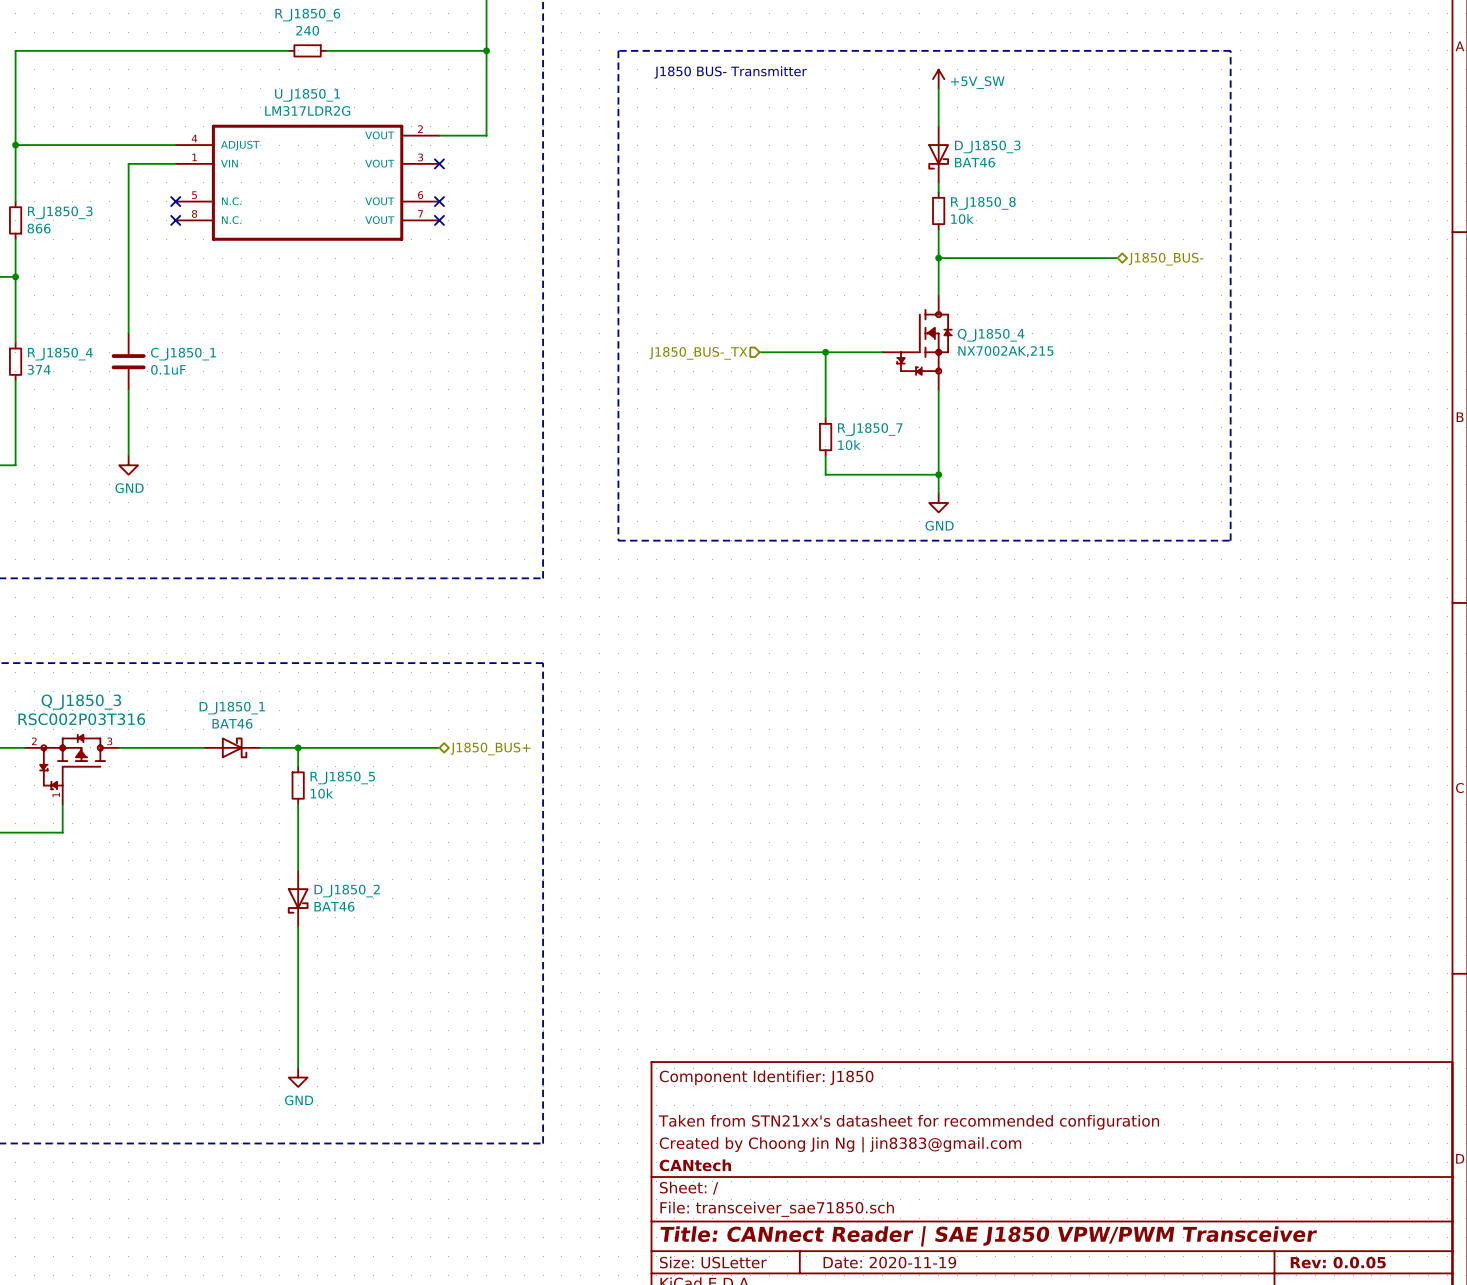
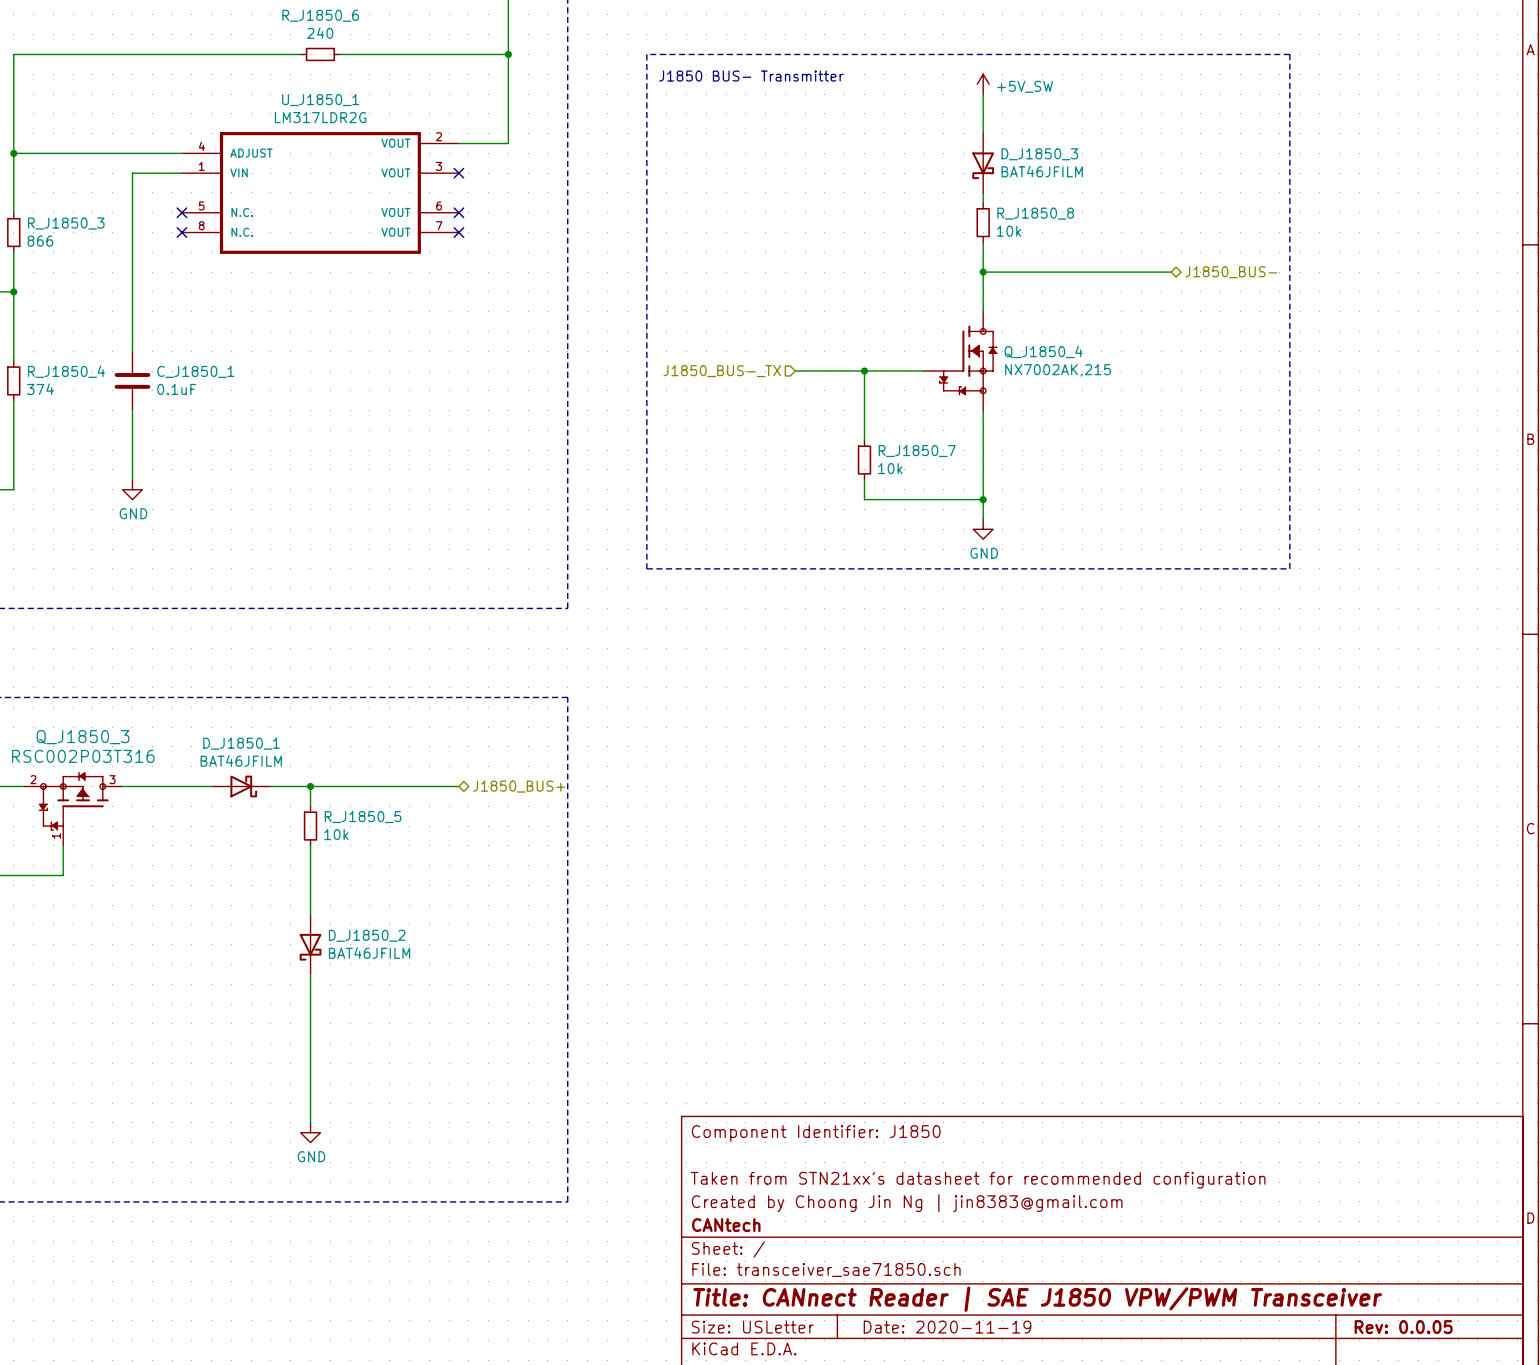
D_J1850_3 value: BAT46 (974, 162) -> BAT46JFILM (1042, 171)
D_J1850_1 value: BAT46 (232, 723) -> BAT46JFILM (241, 760)
D_J1850_2 value: BAT46 (334, 906) -> BAT46JFILM (369, 953)

